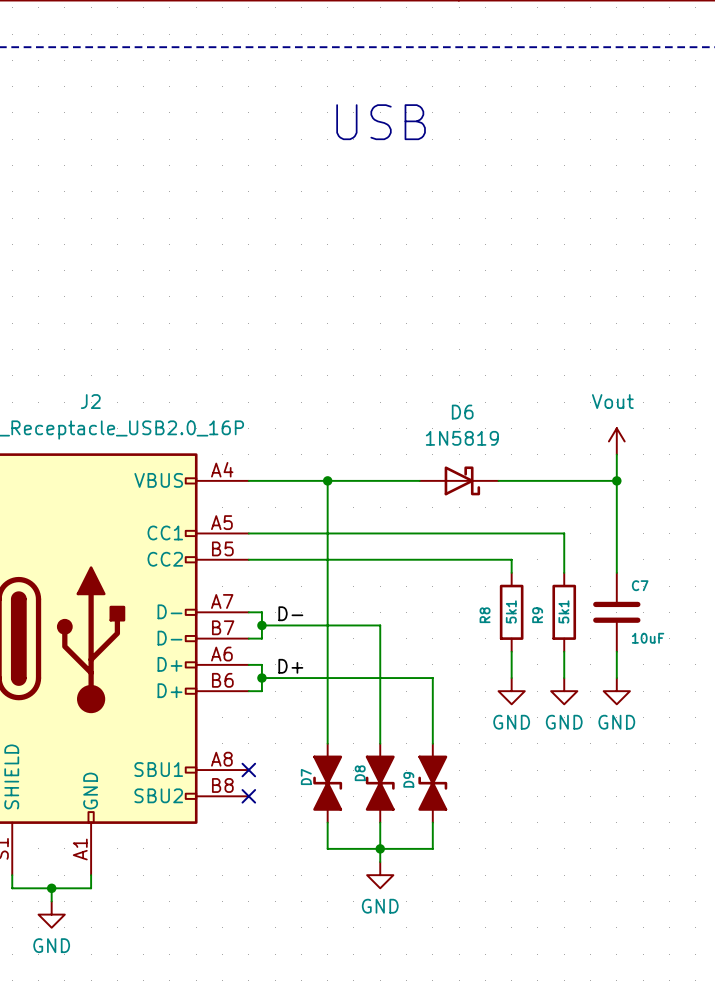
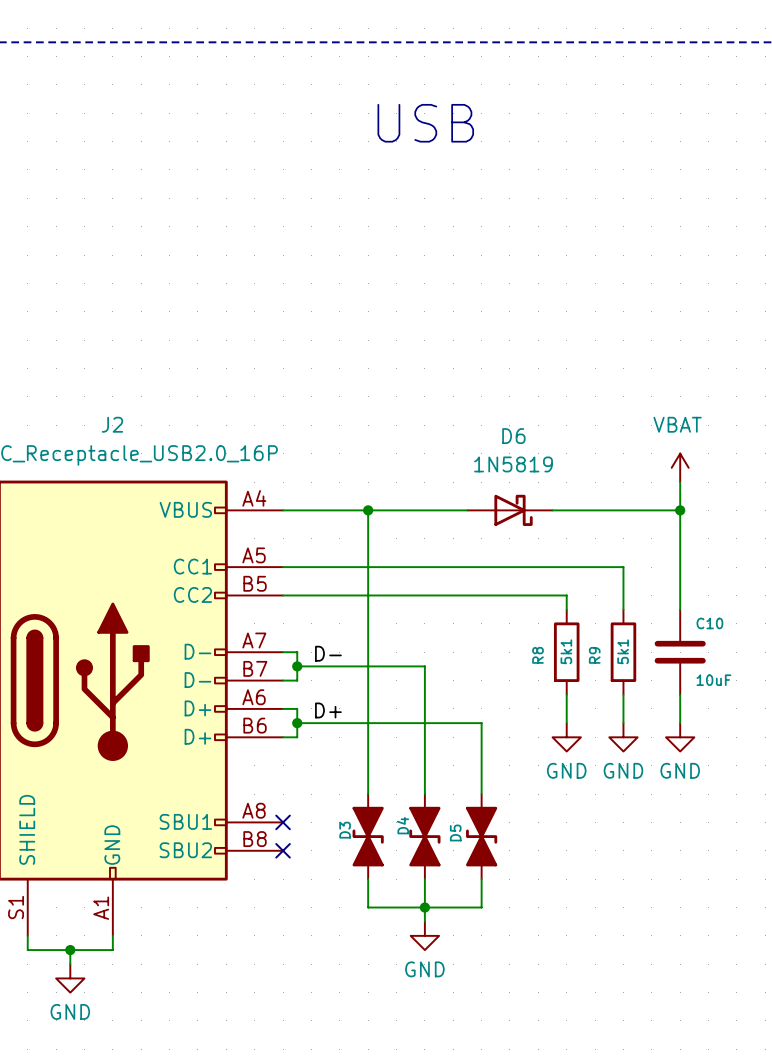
power symbol: Vout (616, 441) -> VBAT (680, 467)
C7 name: C7 (640, 585) -> C10 (709, 623)
D8 name: D8 (360, 773) -> D4 (403, 825)
D7 name: D7 (306, 776) -> D3 (345, 830)
D9 name: D9 (408, 779) -> D5 (455, 832)

